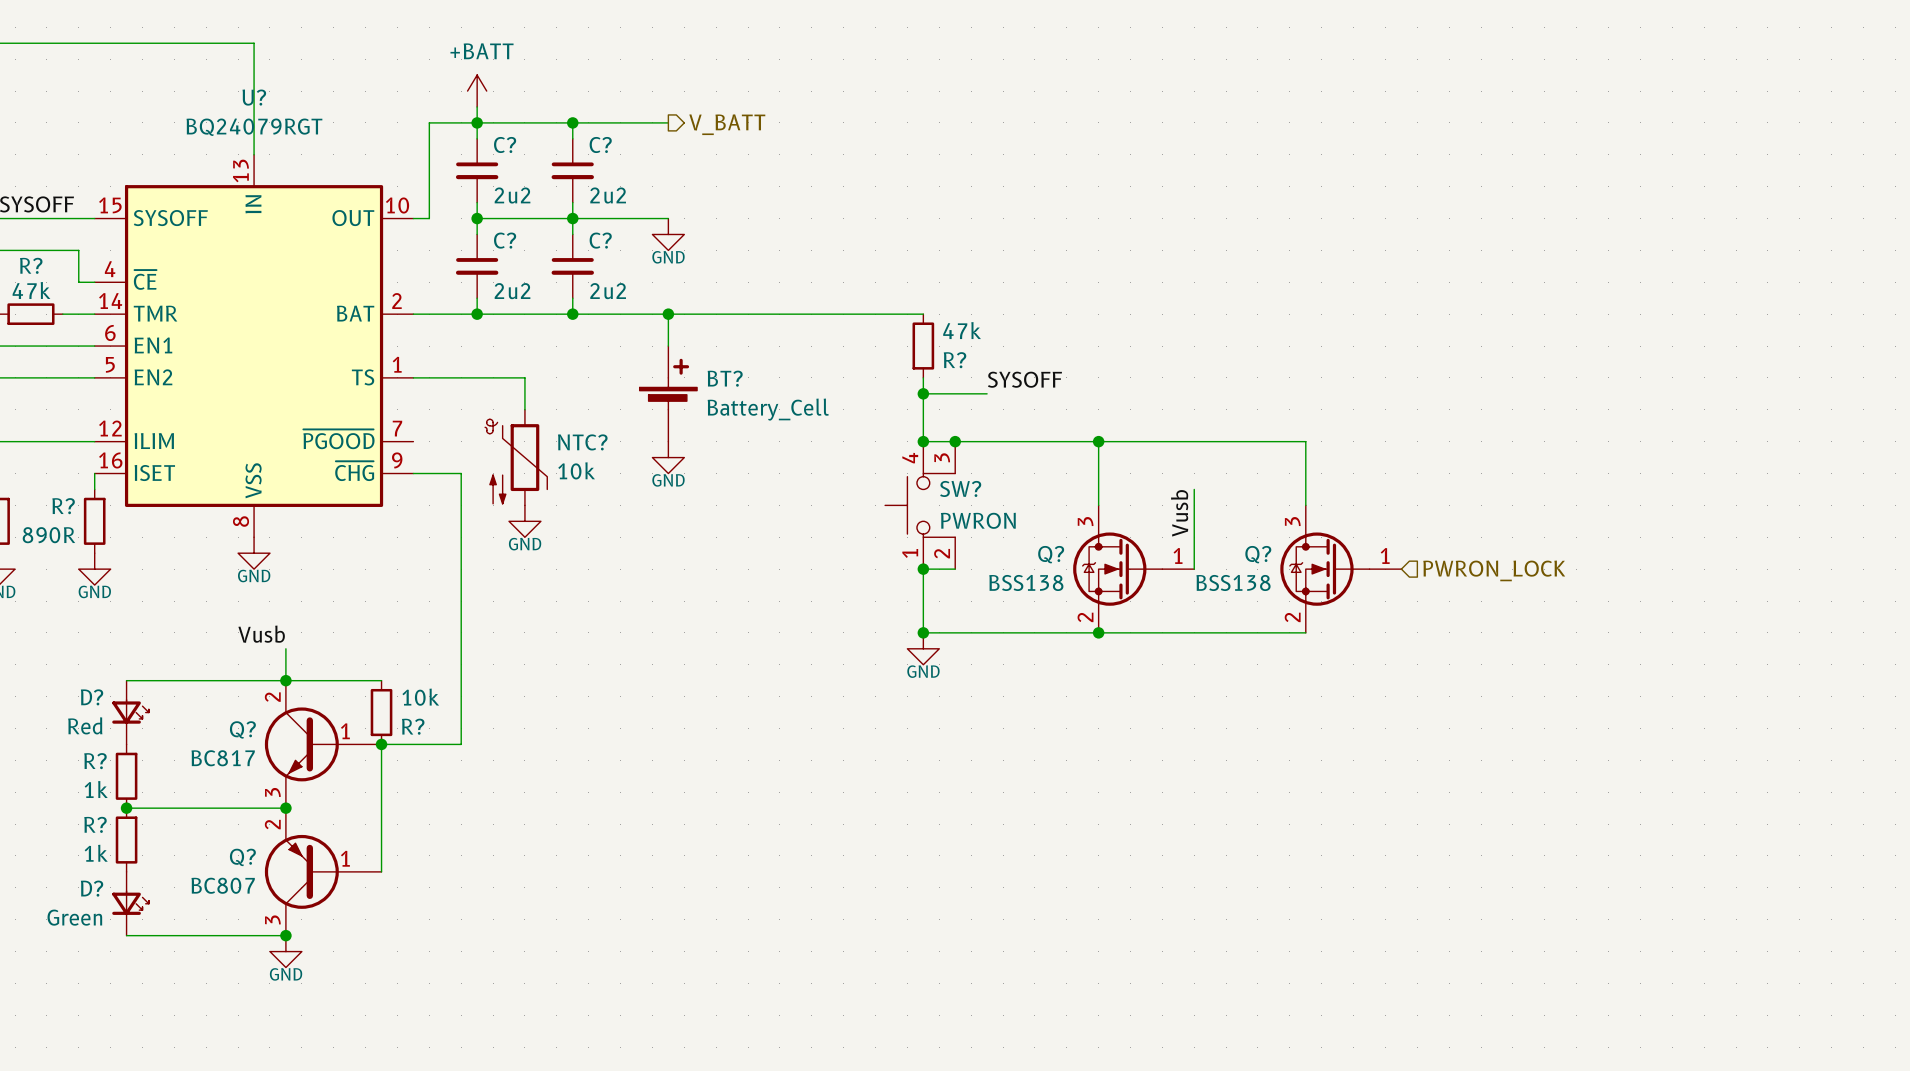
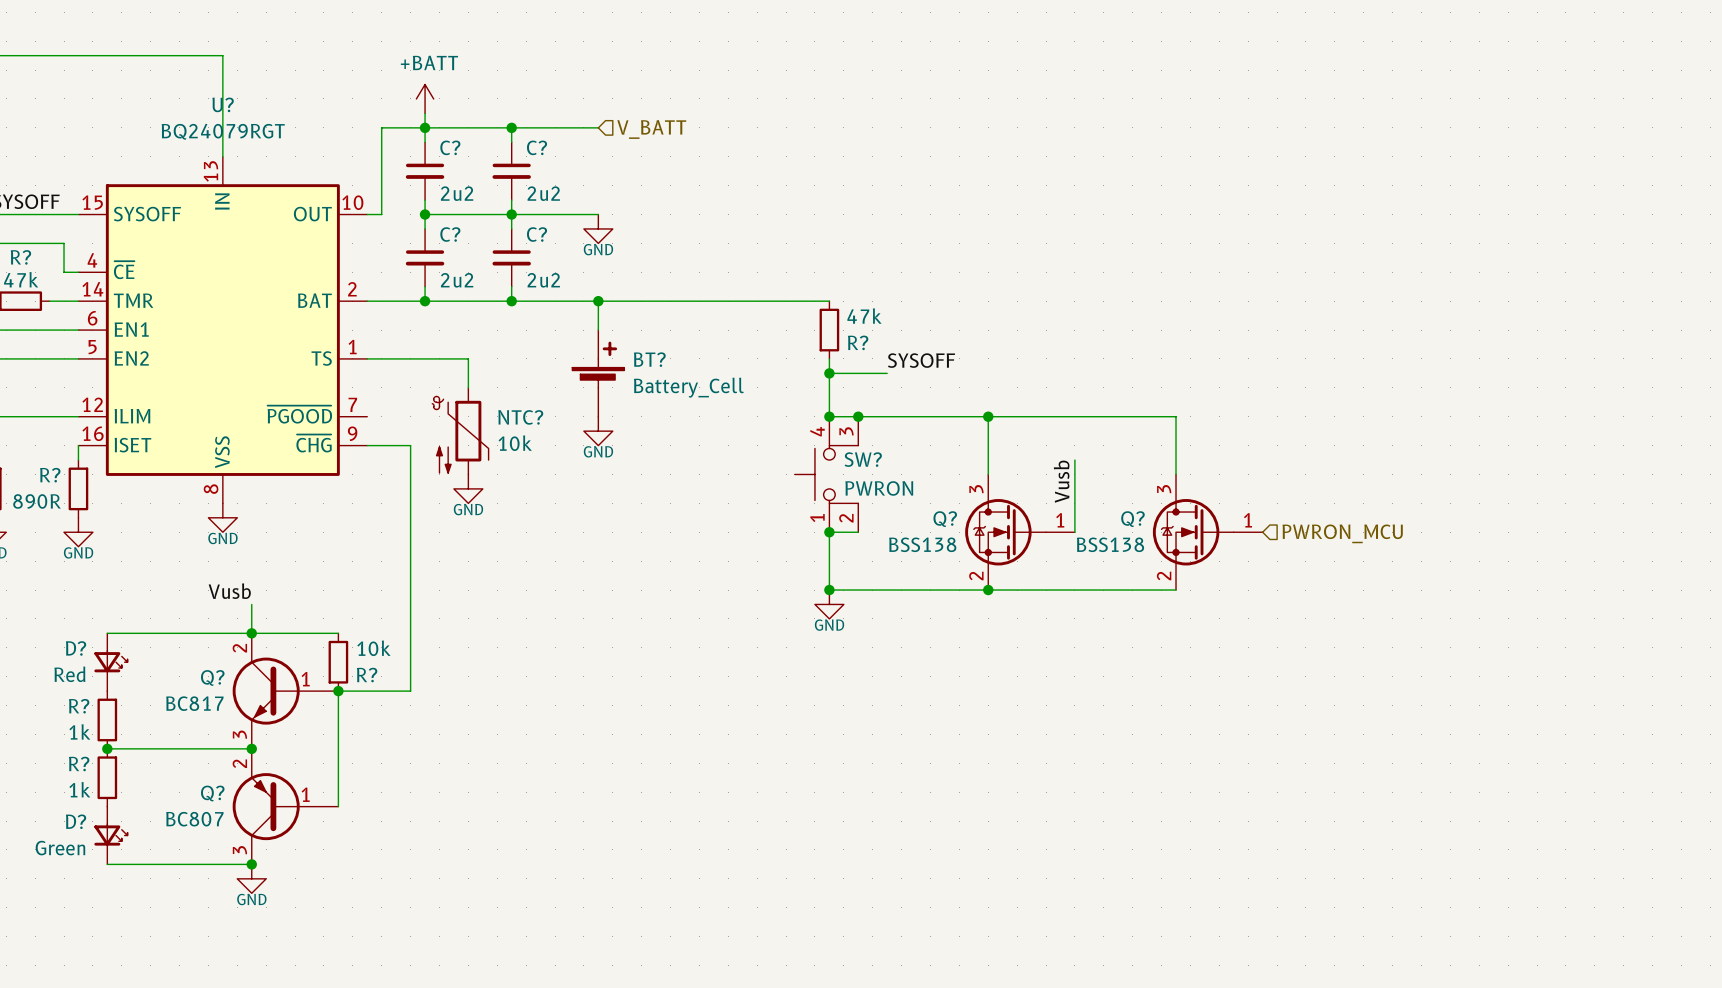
hierarchical label shape: output (727, 124) -> input (651, 129)
hierarchical label: PWRON_LOCK (1494, 570) -> PWRON_MCU (1342, 533)

